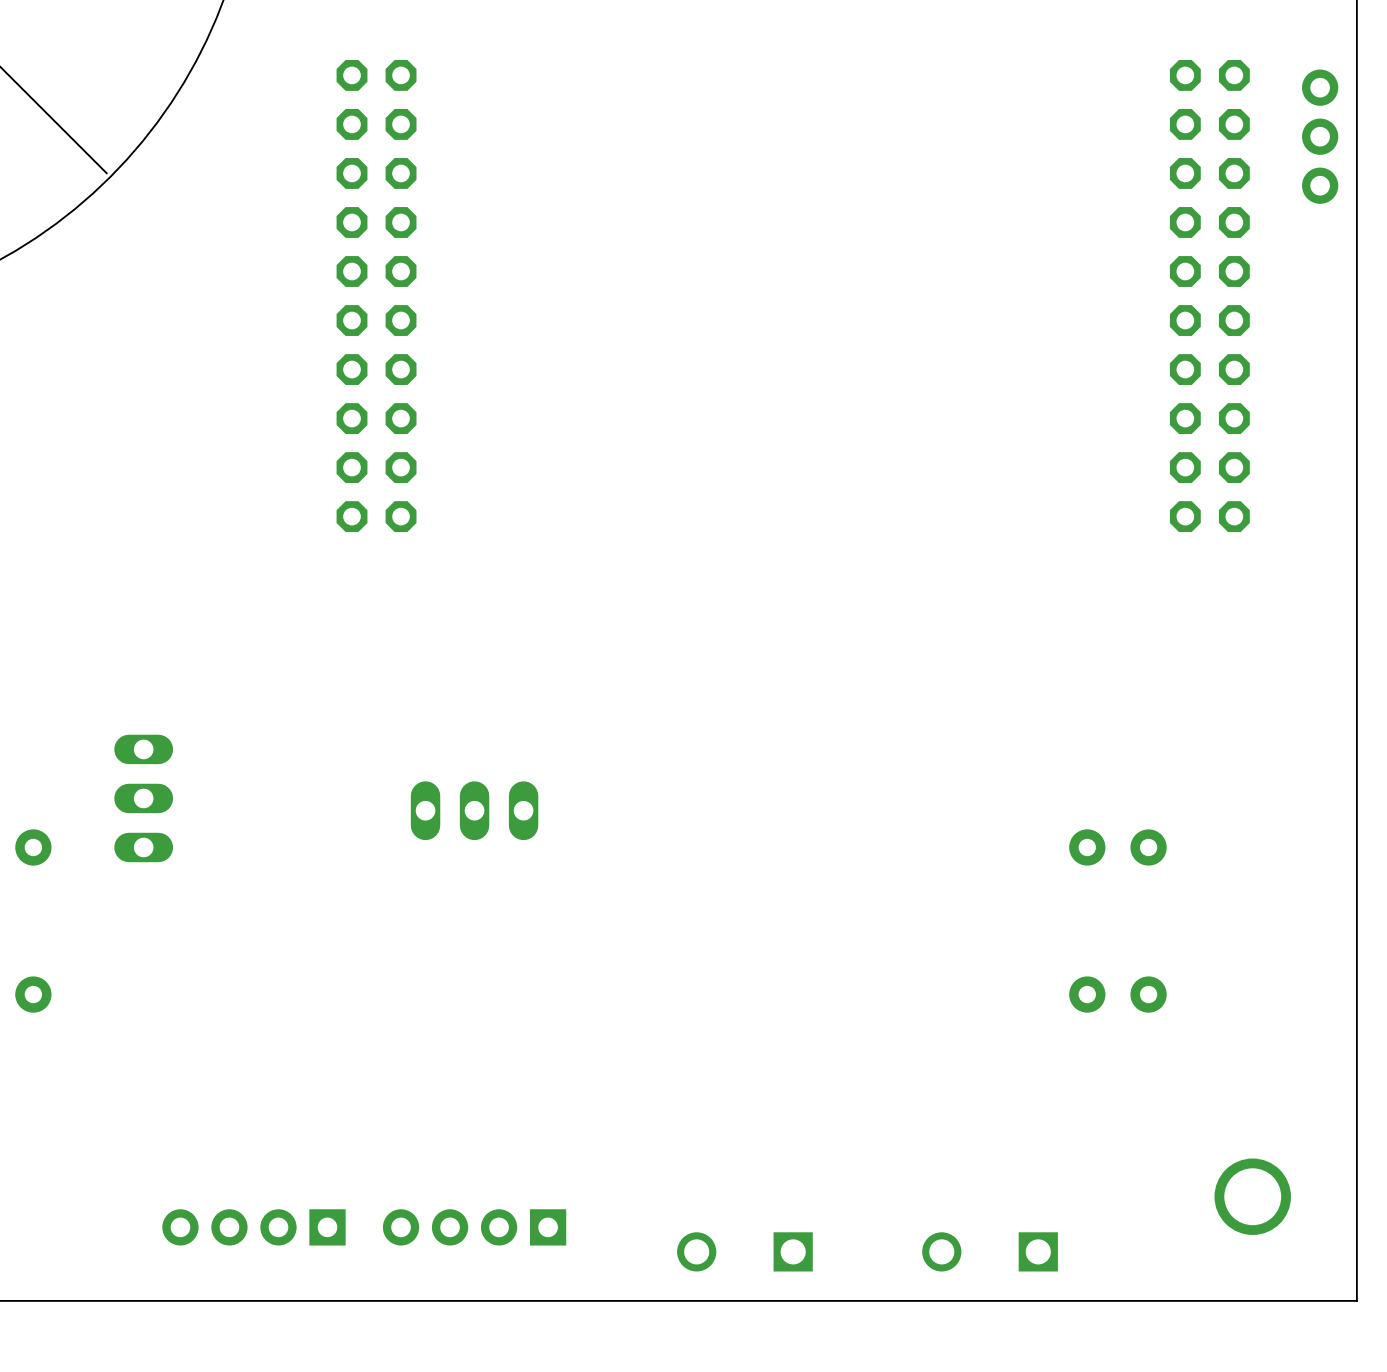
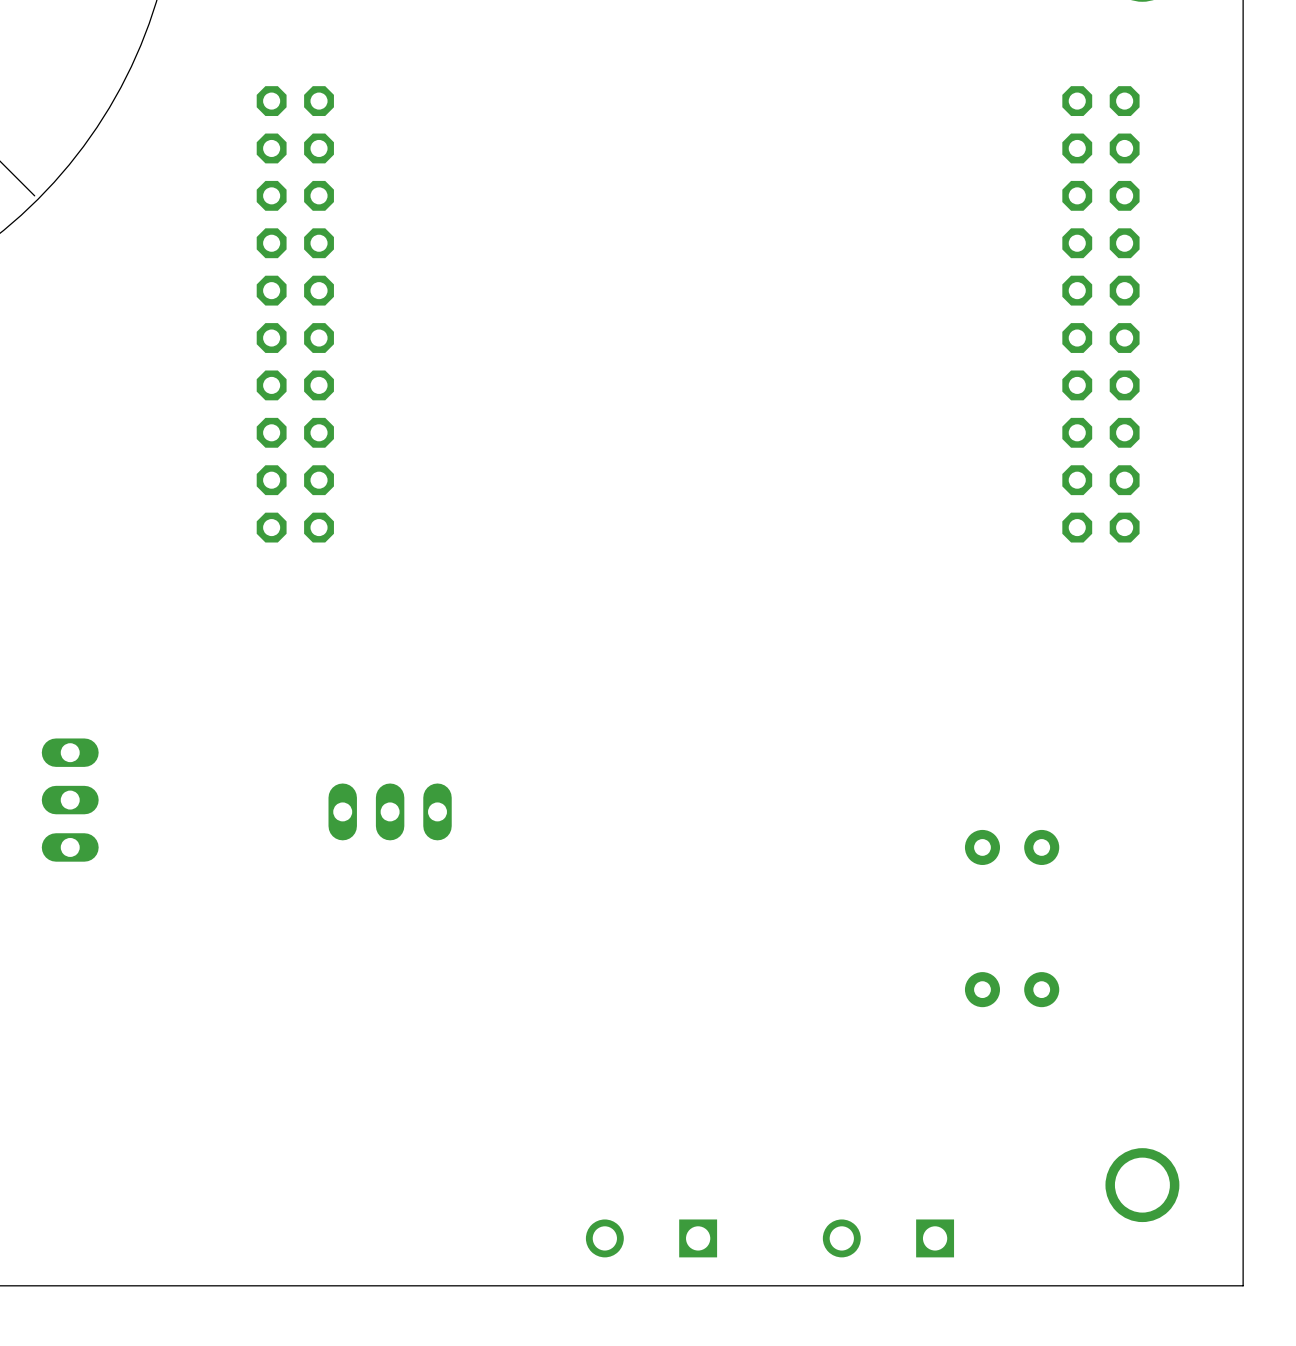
part: (1320, 136) -> none
part: (253, 1227) -> none
part: (474, 1227) -> none

